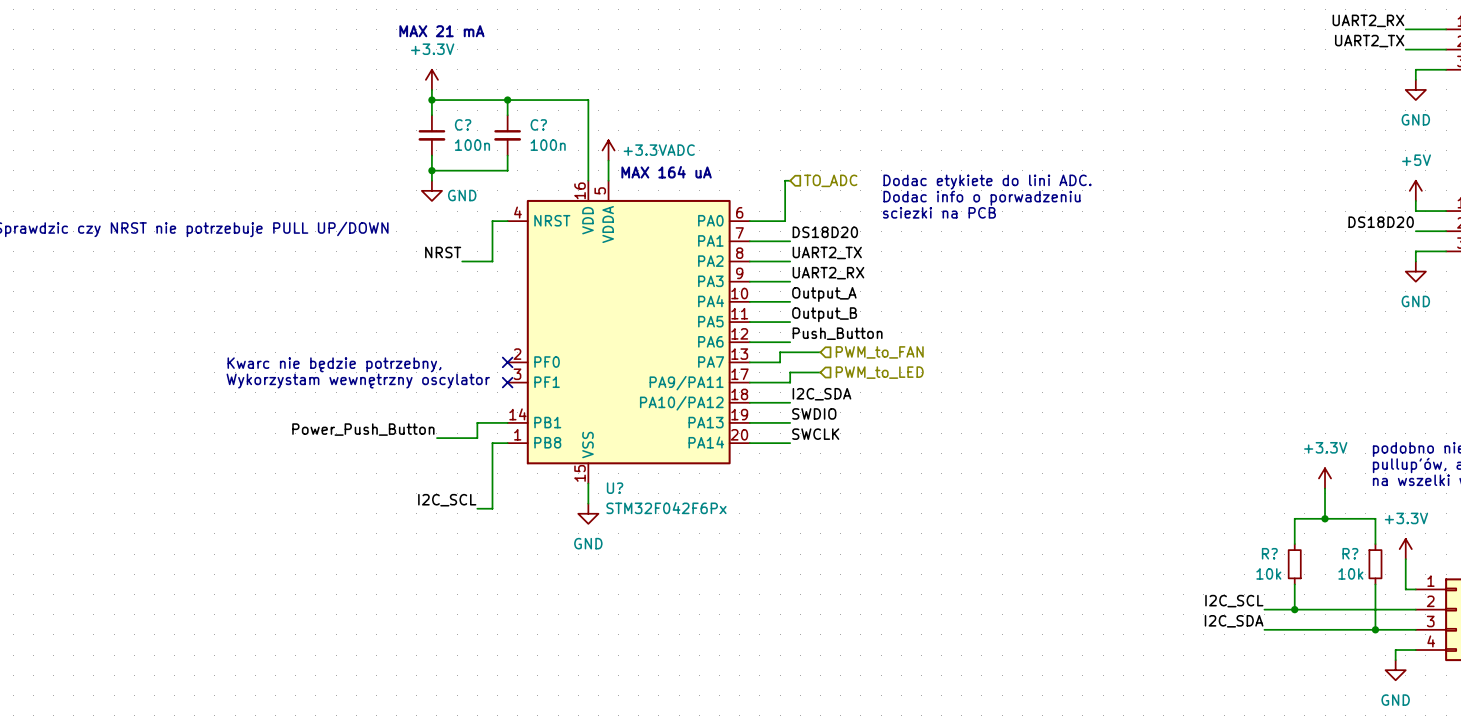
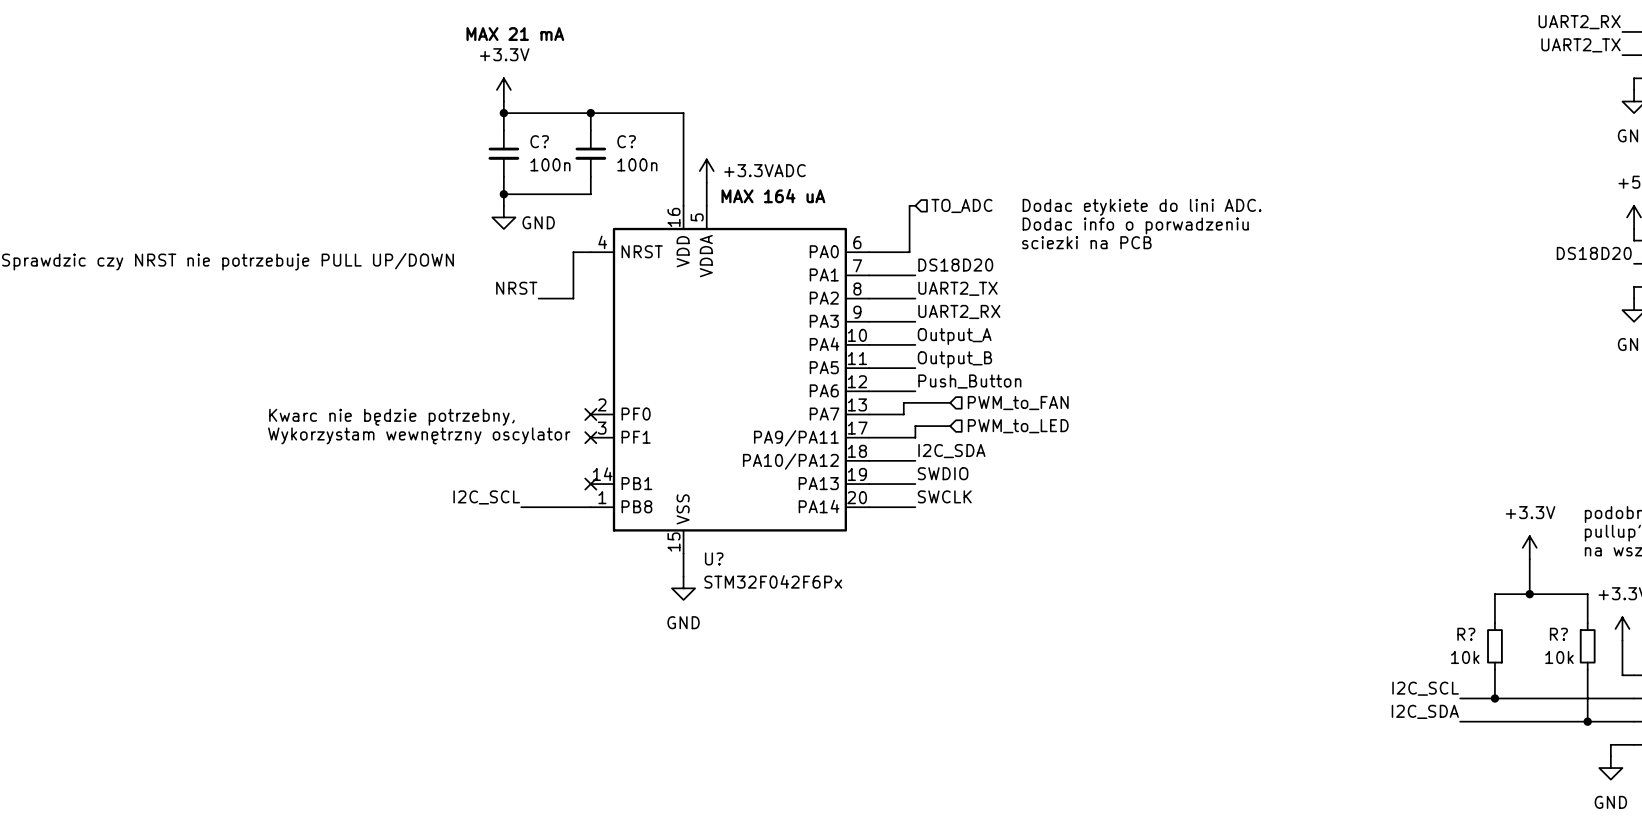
wire: (507, 422) (477, 422) (477, 438) (436, 438) -> none
no-connect mark: none -> (590, 484)
label: Power_Push_Button (363, 429) -> none
wire: (492, 443) (492, 508) (477, 508) -> (573, 507) (521, 507)
label position: I2C_SCL (447, 500) -> I2C_SCL (486, 497)

